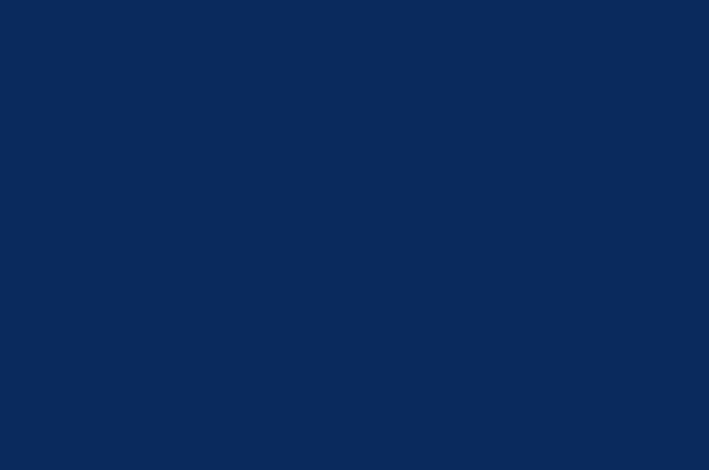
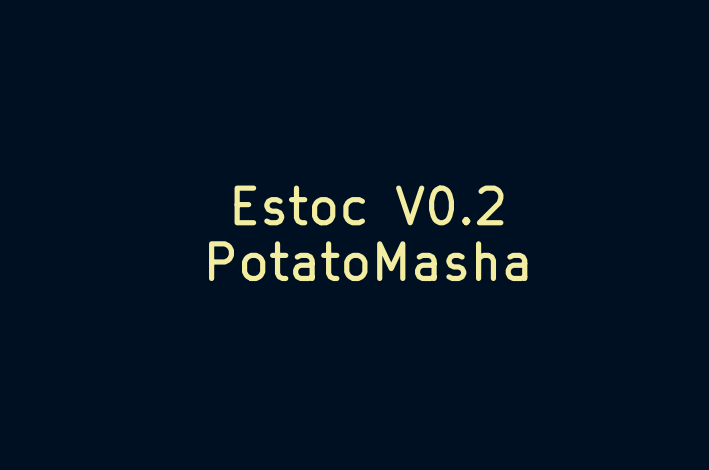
text: none -> Estoc V0.2 (369, 205)
text: none -> PotatoMasha (368, 261)

